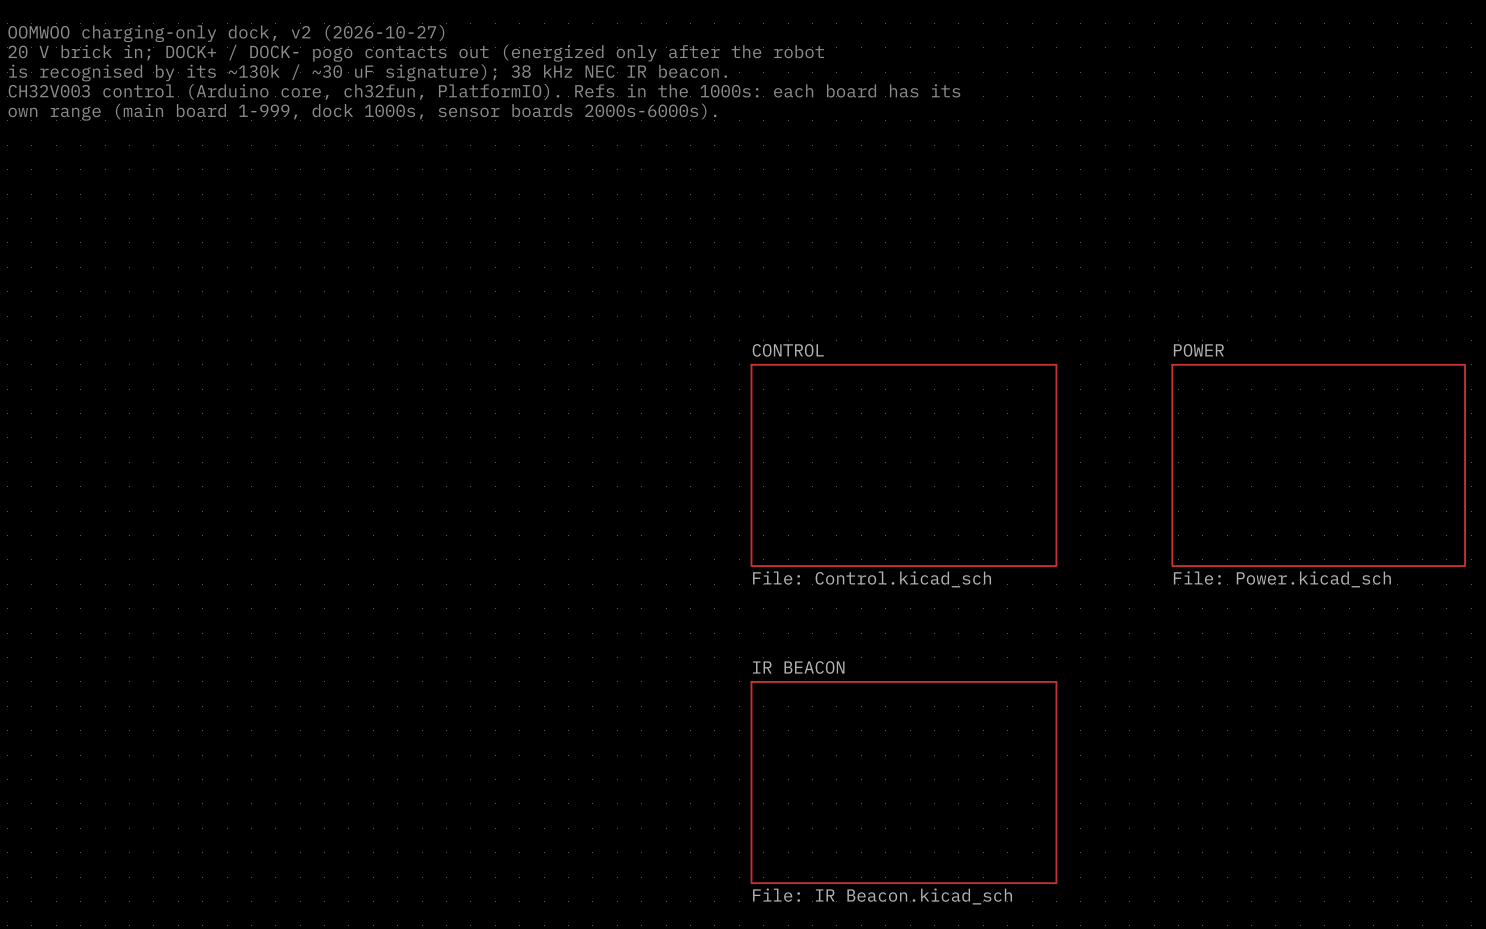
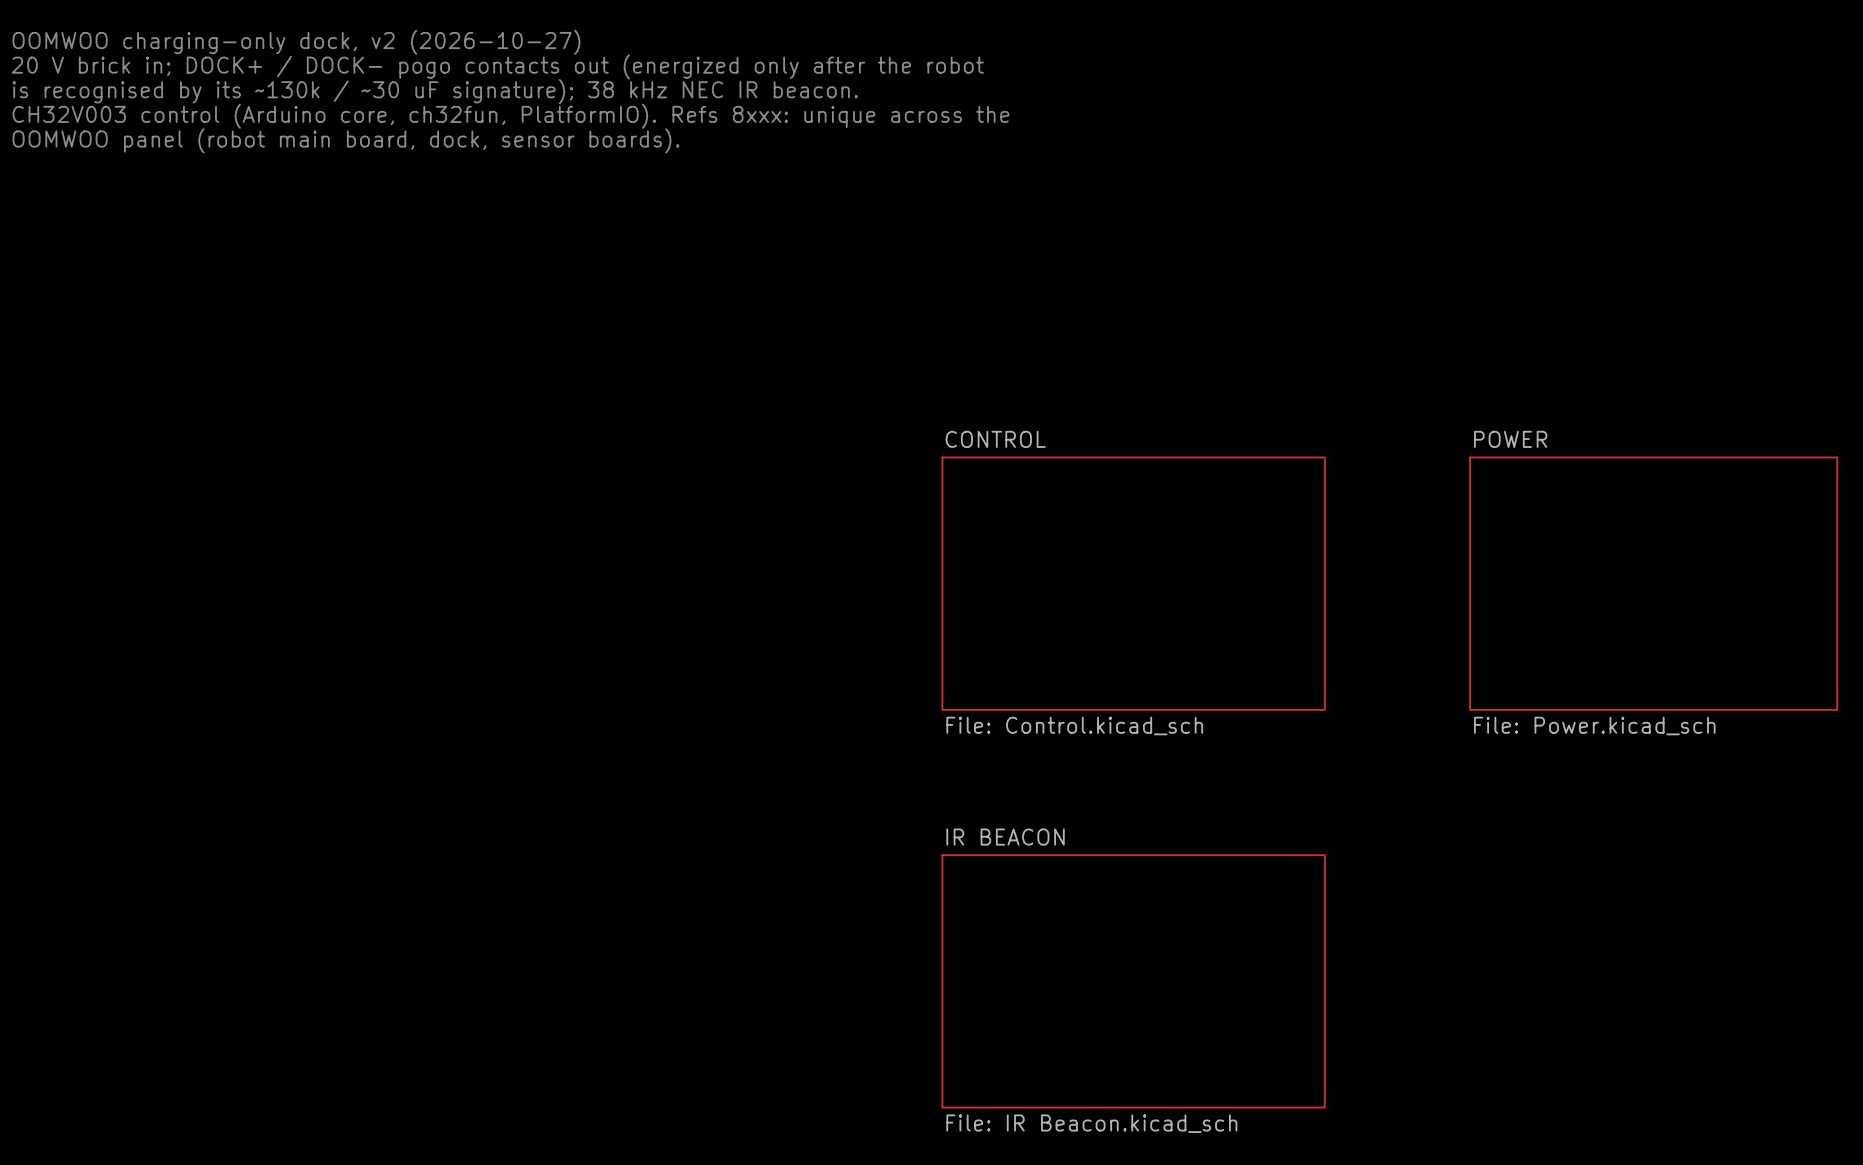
text: CH32V003 control (Arduino core, ch32fun, PlatformIO). Refs in the 1000s: each board has its (484, 91) -> CH32V003 control (Arduino core, ch32fun, PlatformIO). Refs 8xxx: unique across the (510, 116)
text: own range (main board 1-999, dock 1000s, sensor boards 2000s-6000s). (362, 112) -> OOMWOO panel (robot main board, dock, sensor boards). (345, 140)

